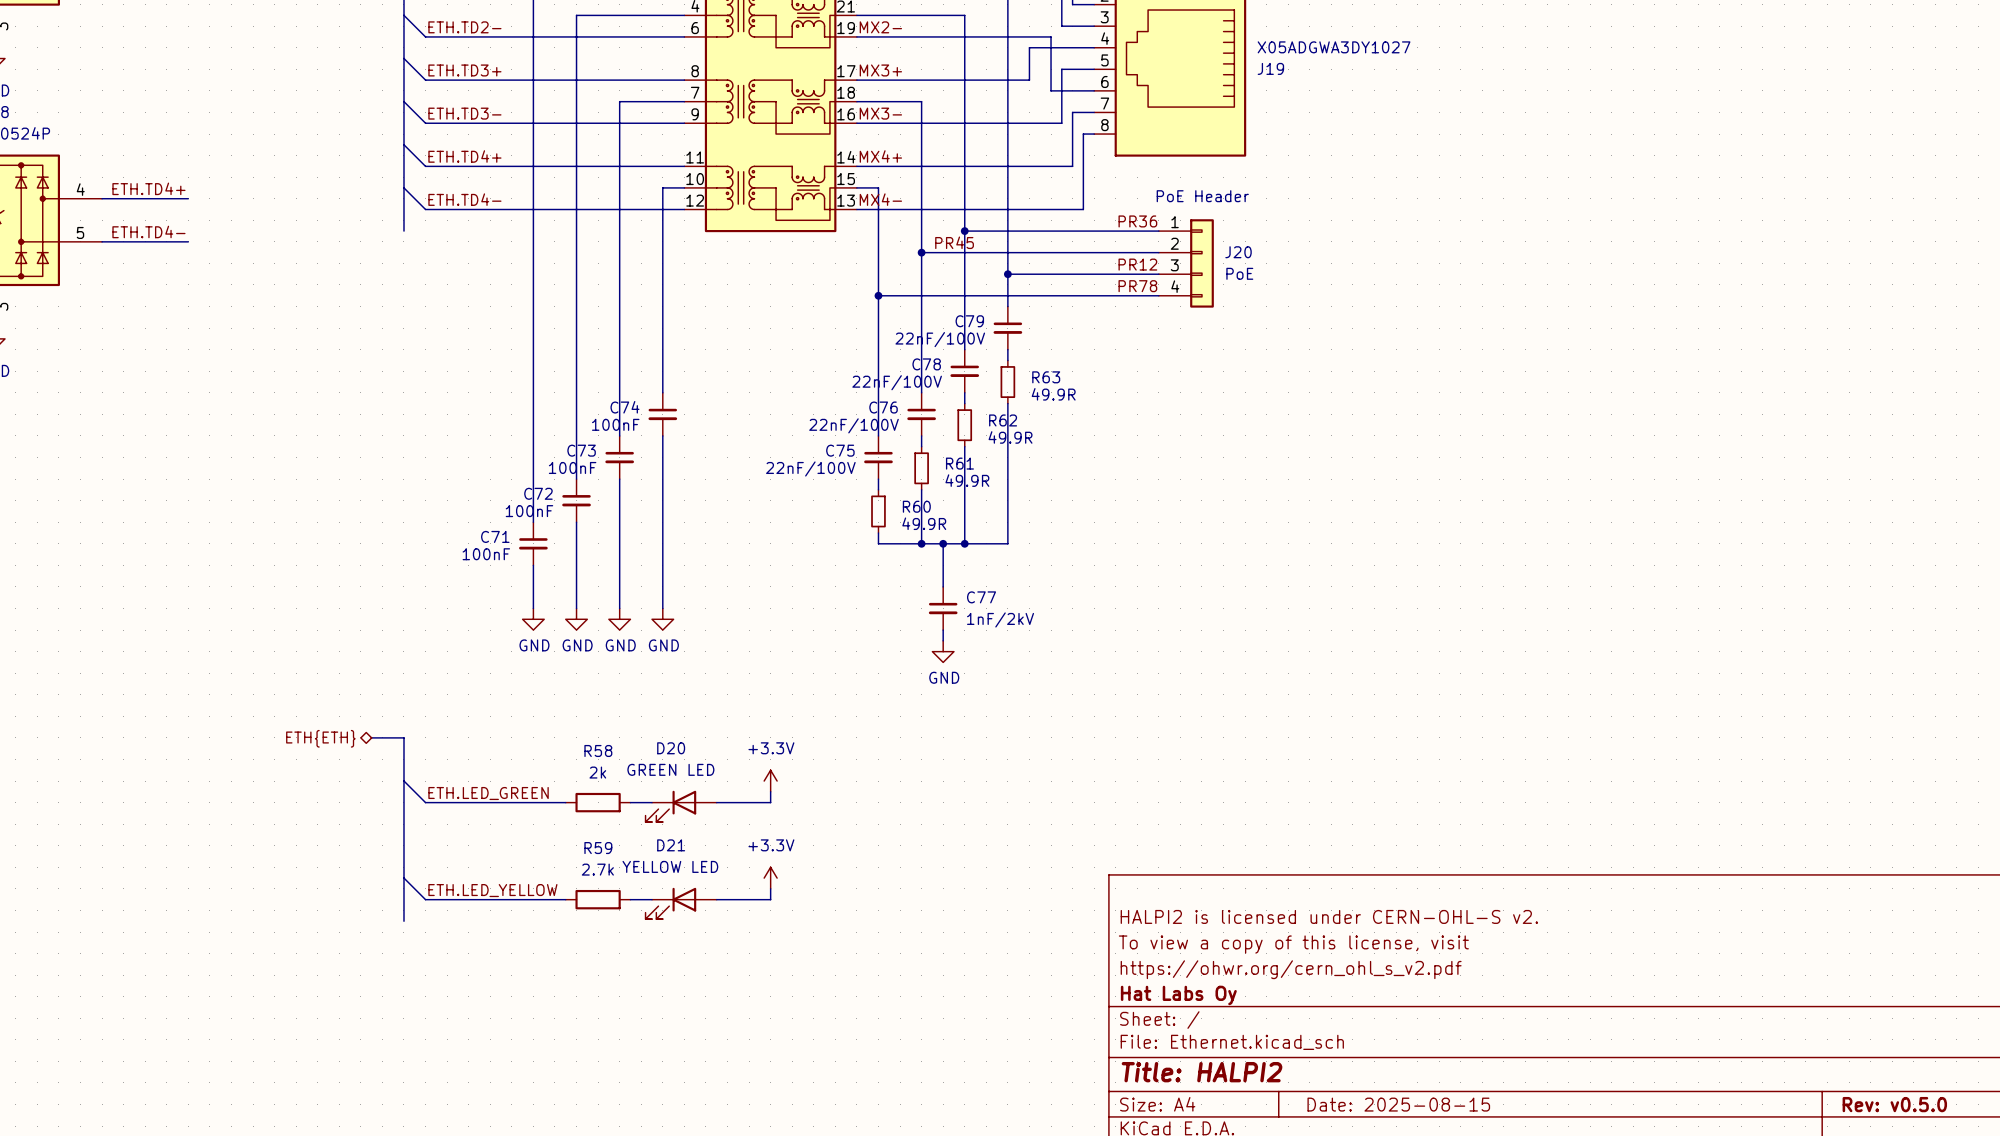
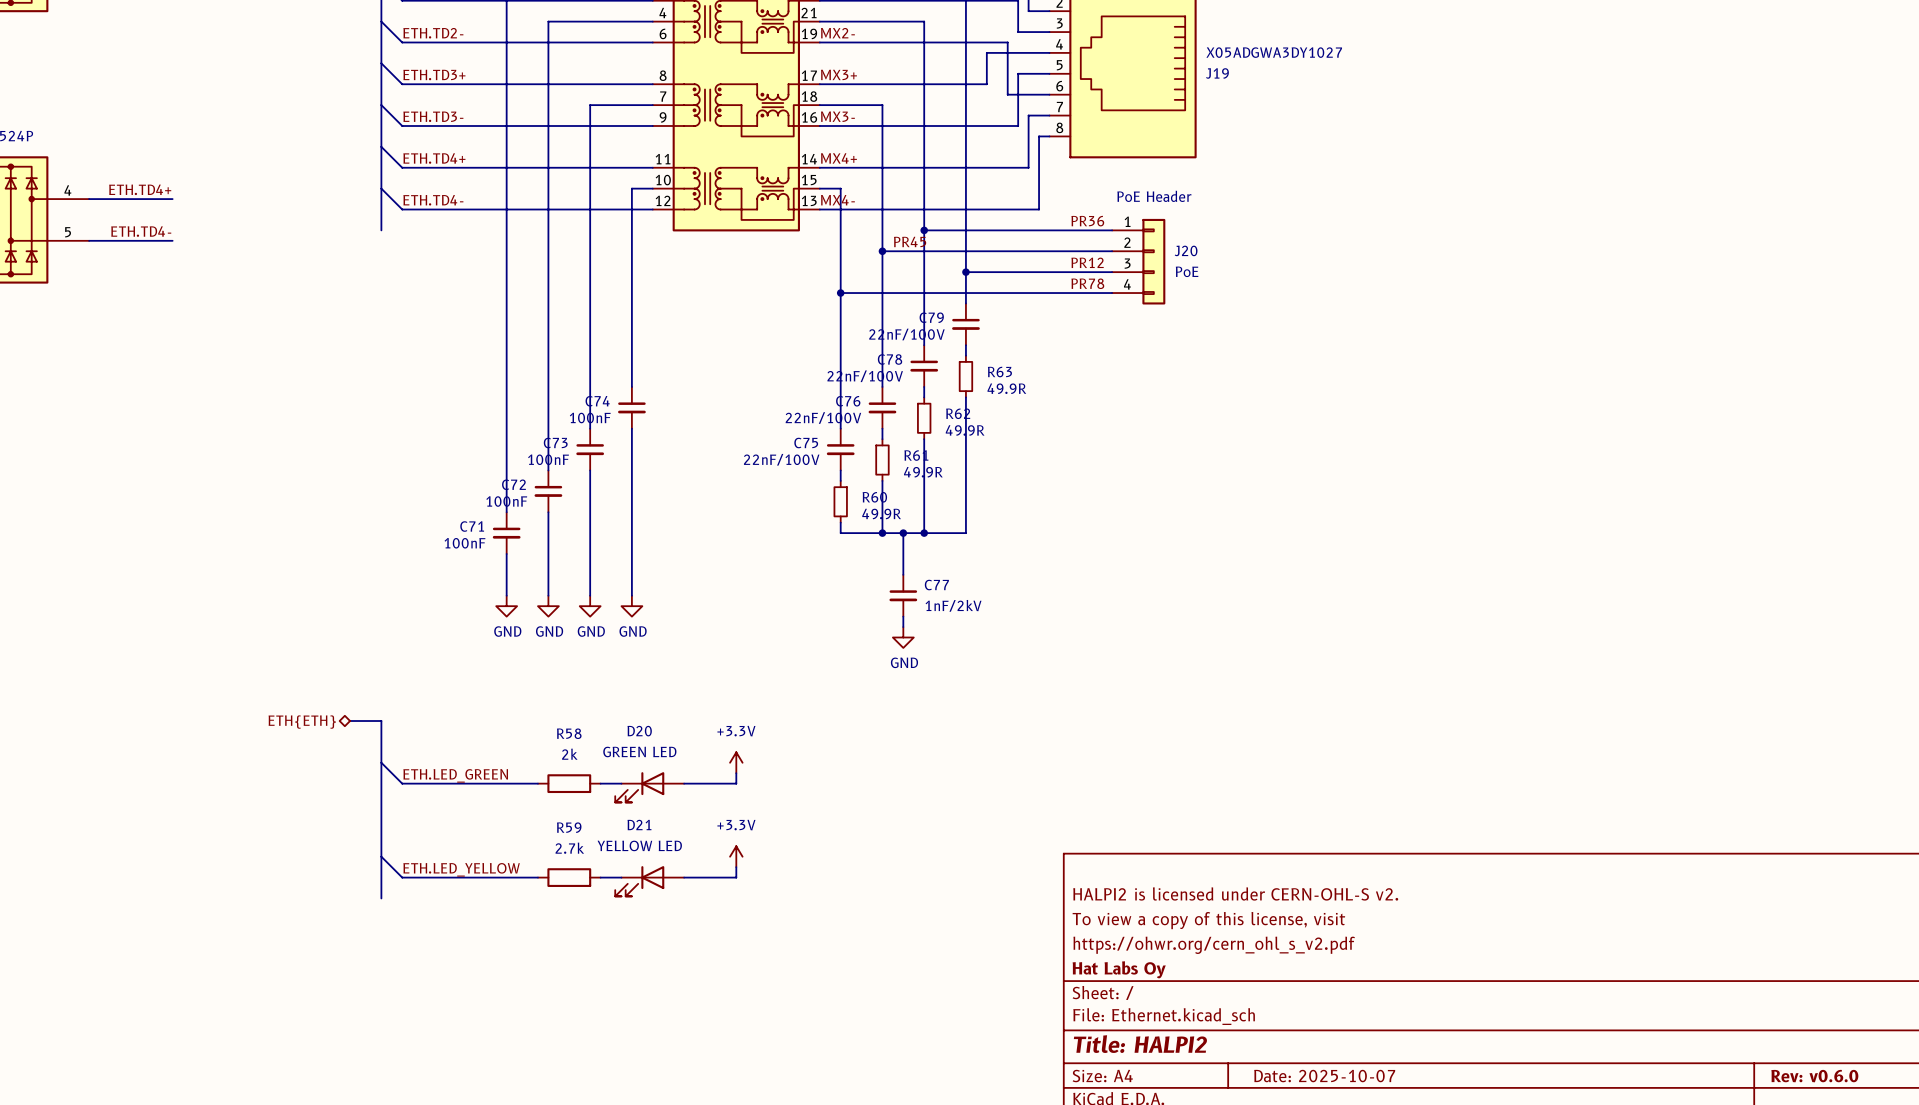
title block: Date: 2025-08-15 (1398, 1104) -> Date: 2025-10-07 (1324, 1076)
title block: Rev: v0.5.0 (1894, 1104) -> Rev: v0.6.0 (1814, 1076)

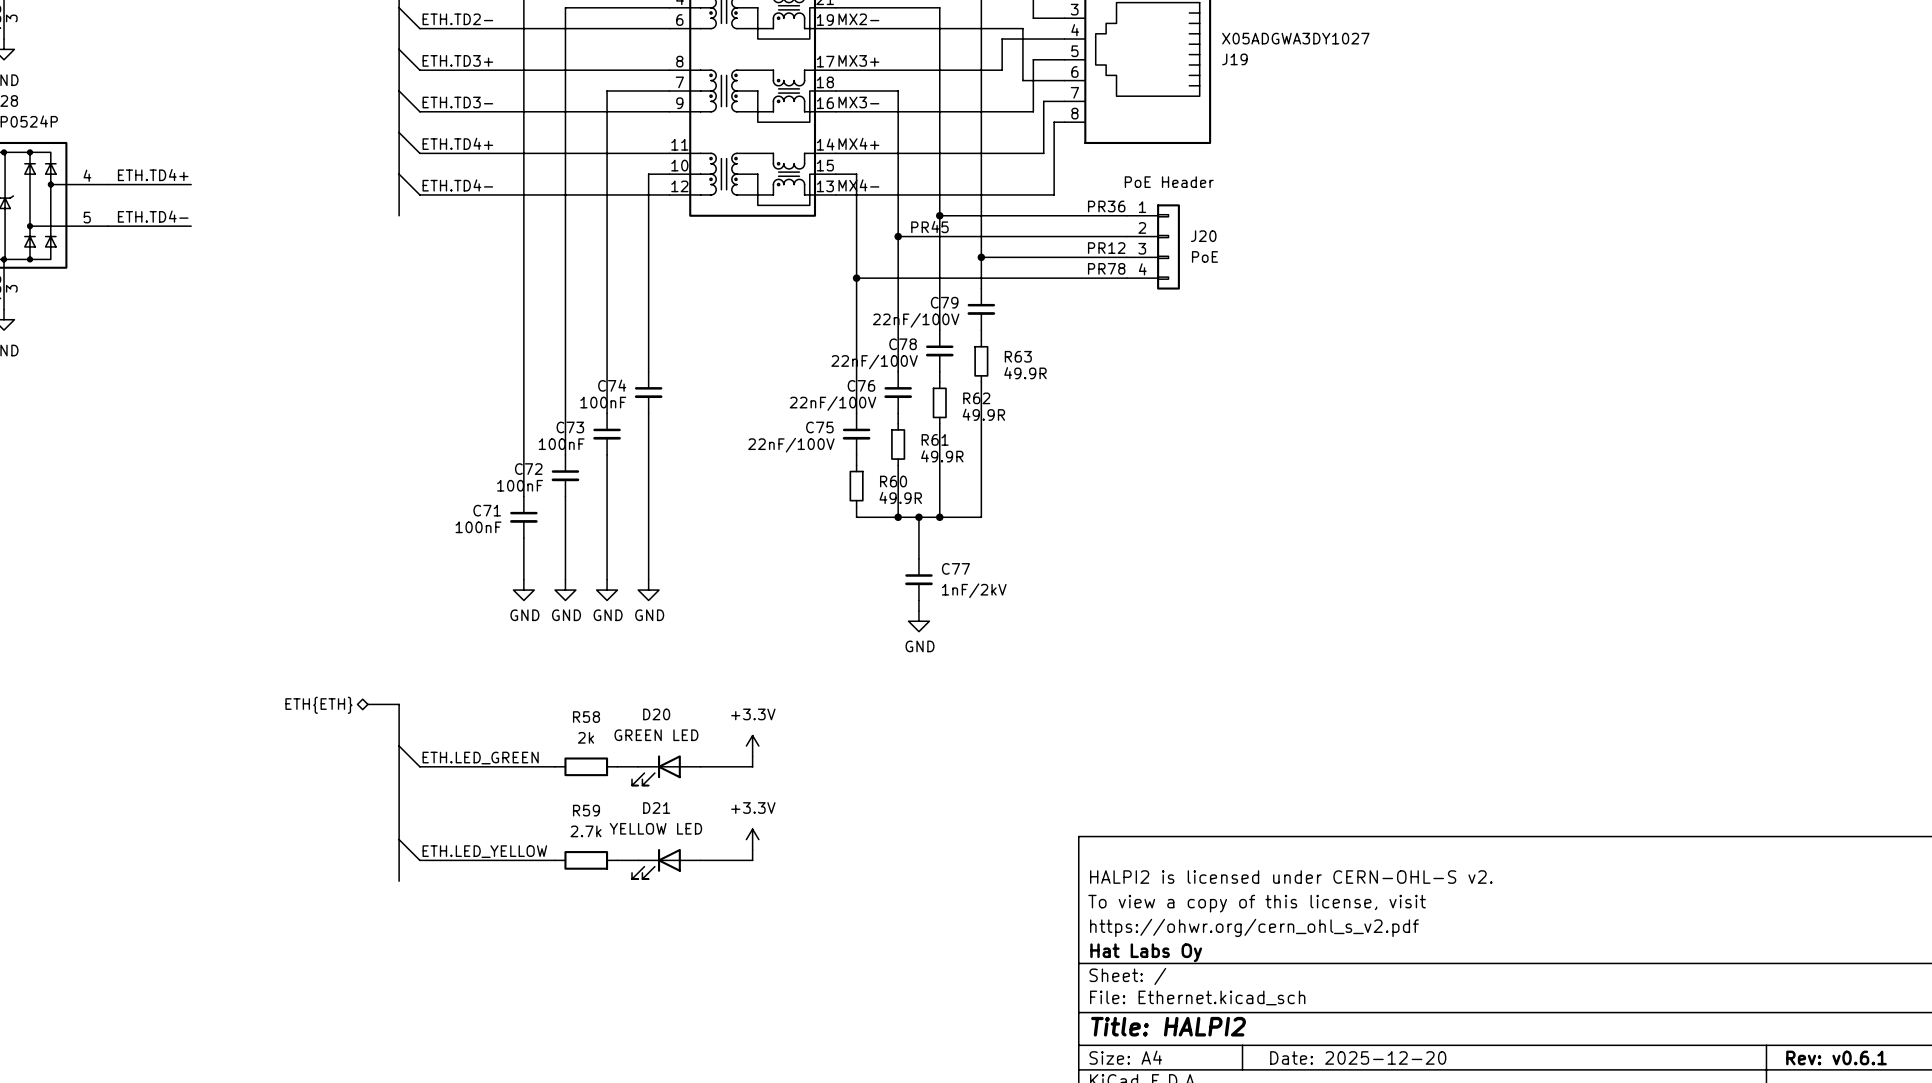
title block: Date: 2025-10-07 (1324, 1076) -> Date: 2025-12-20 (1358, 1057)
title block: Rev: v0.6.0 (1814, 1076) -> Rev: v0.6.1 (1836, 1057)

